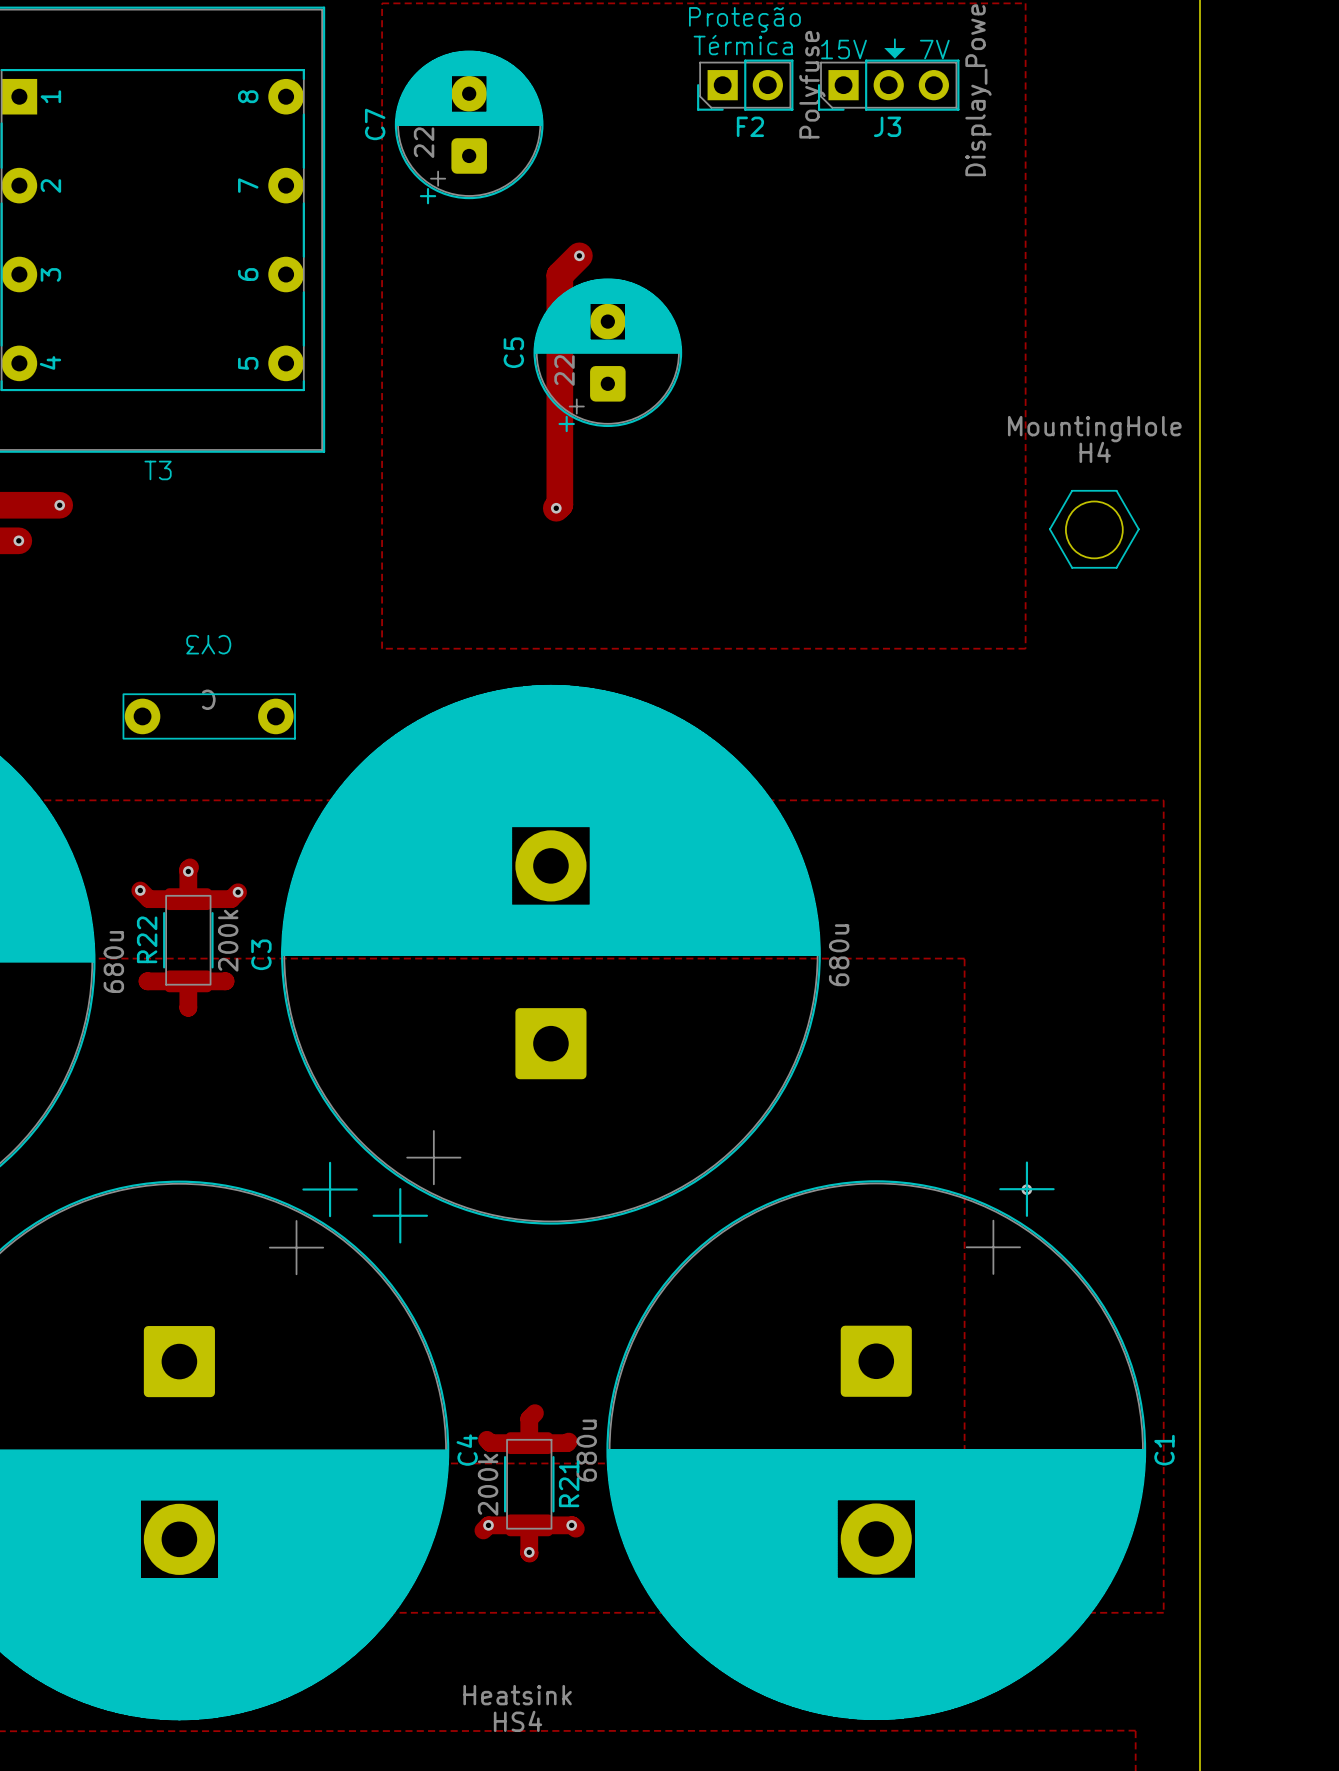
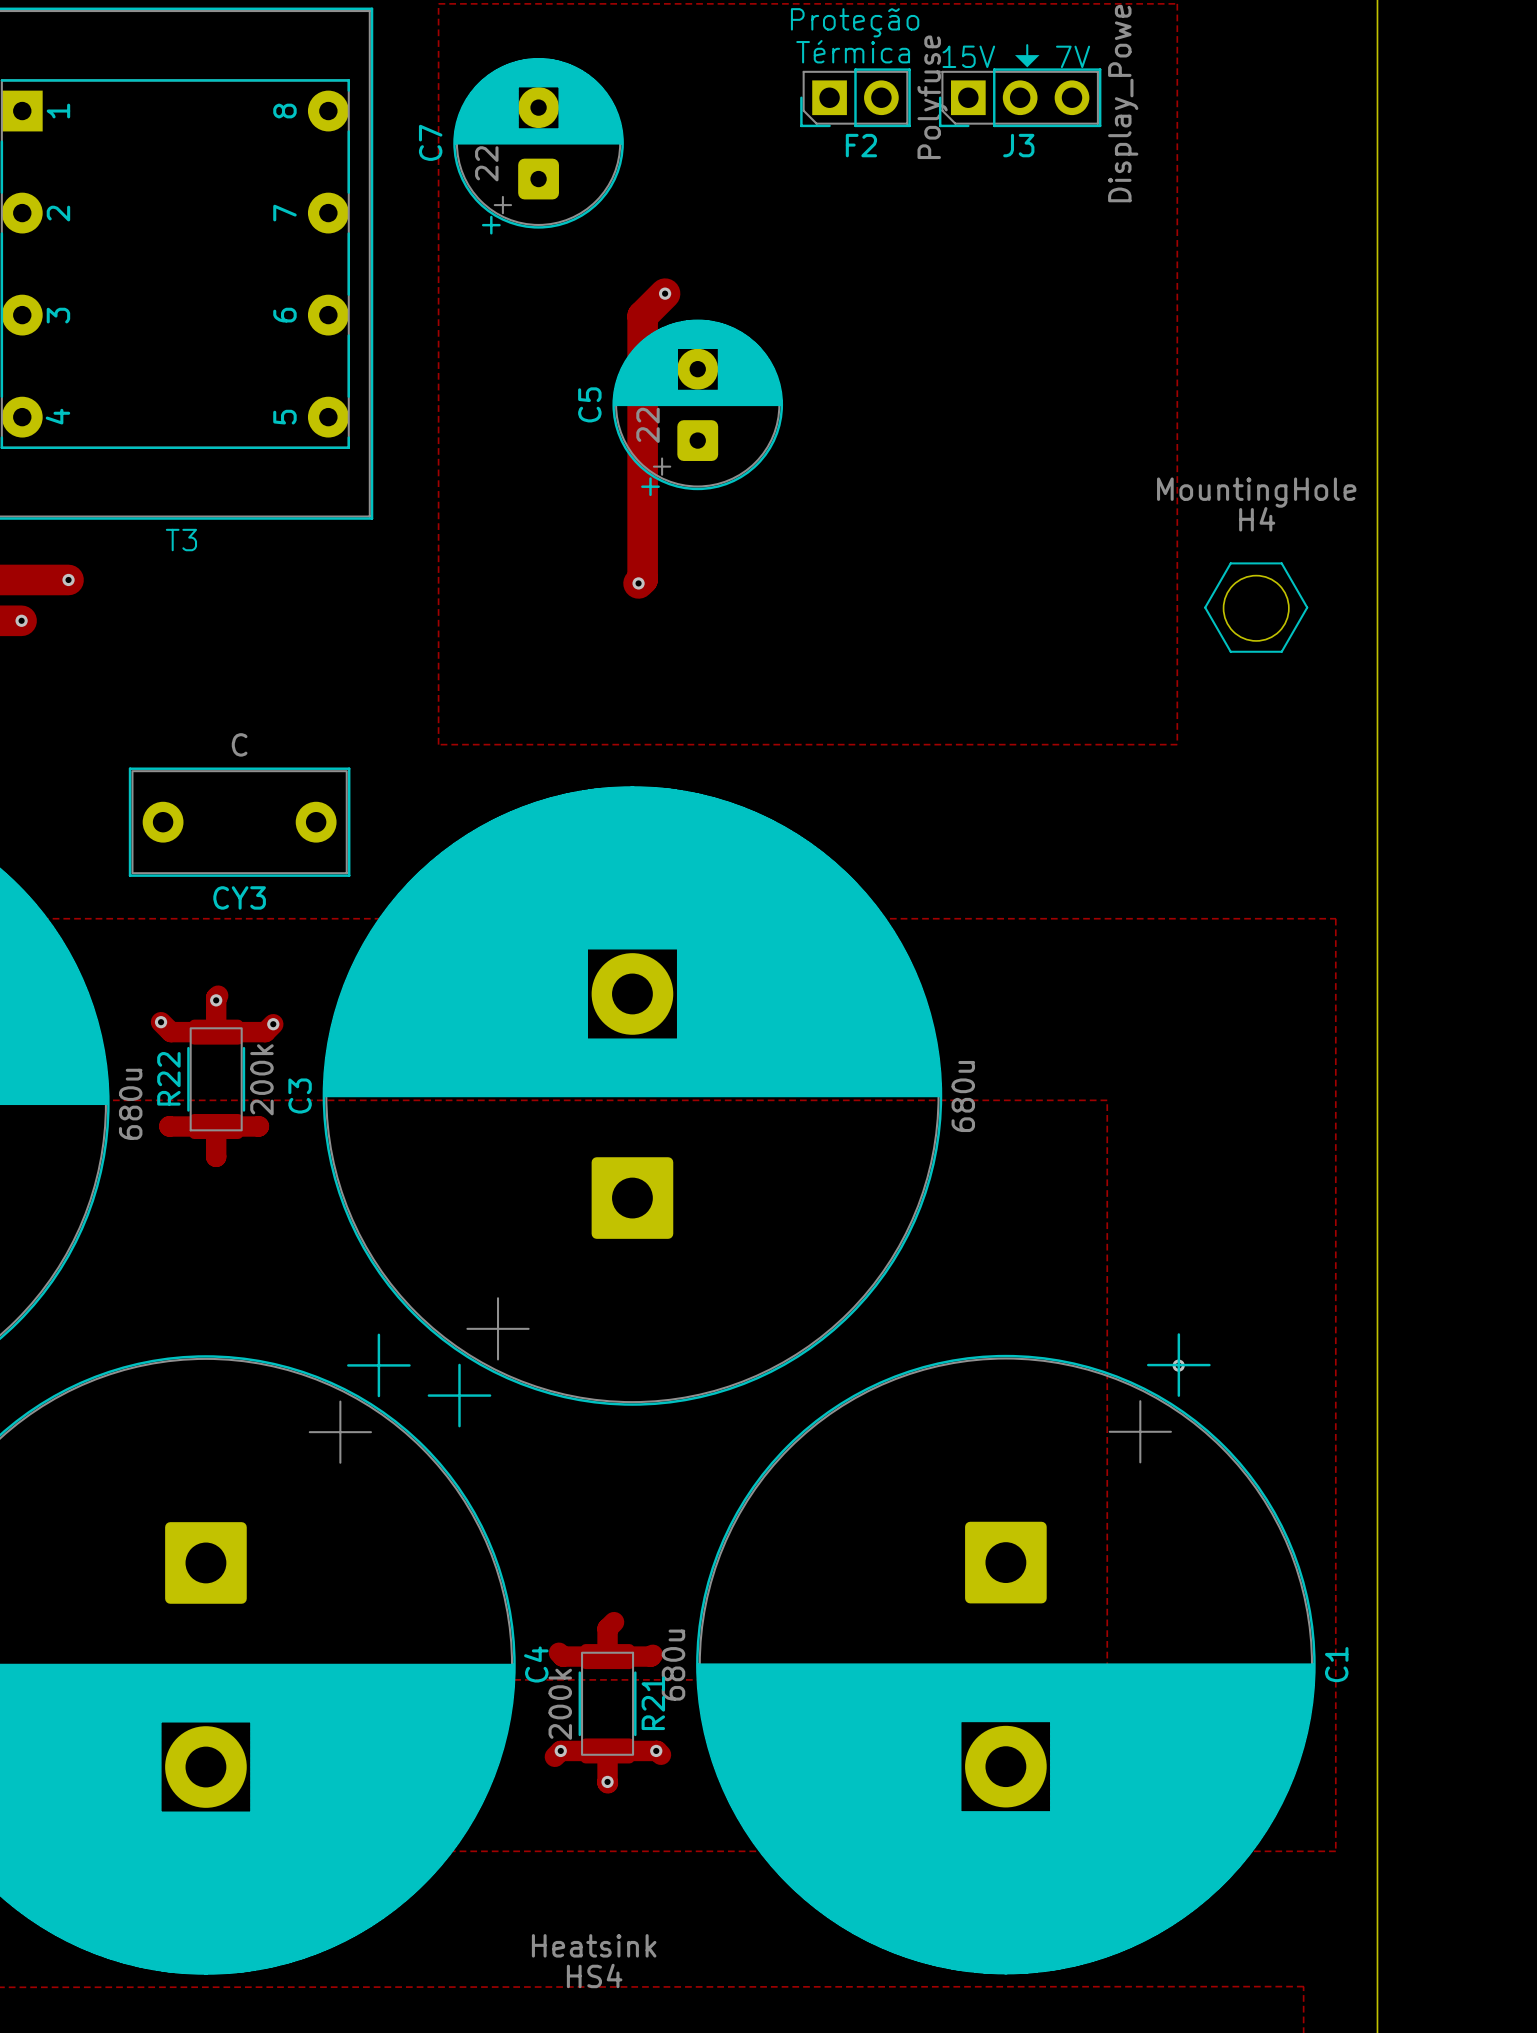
CY3 name position: CY3 (208, 644) -> CY3 (239, 897)
CY3 footprint: [122, 693, 296, 740] -> [128, 767, 351, 877]
CY3 value position: C (208, 699) -> C (239, 744)

